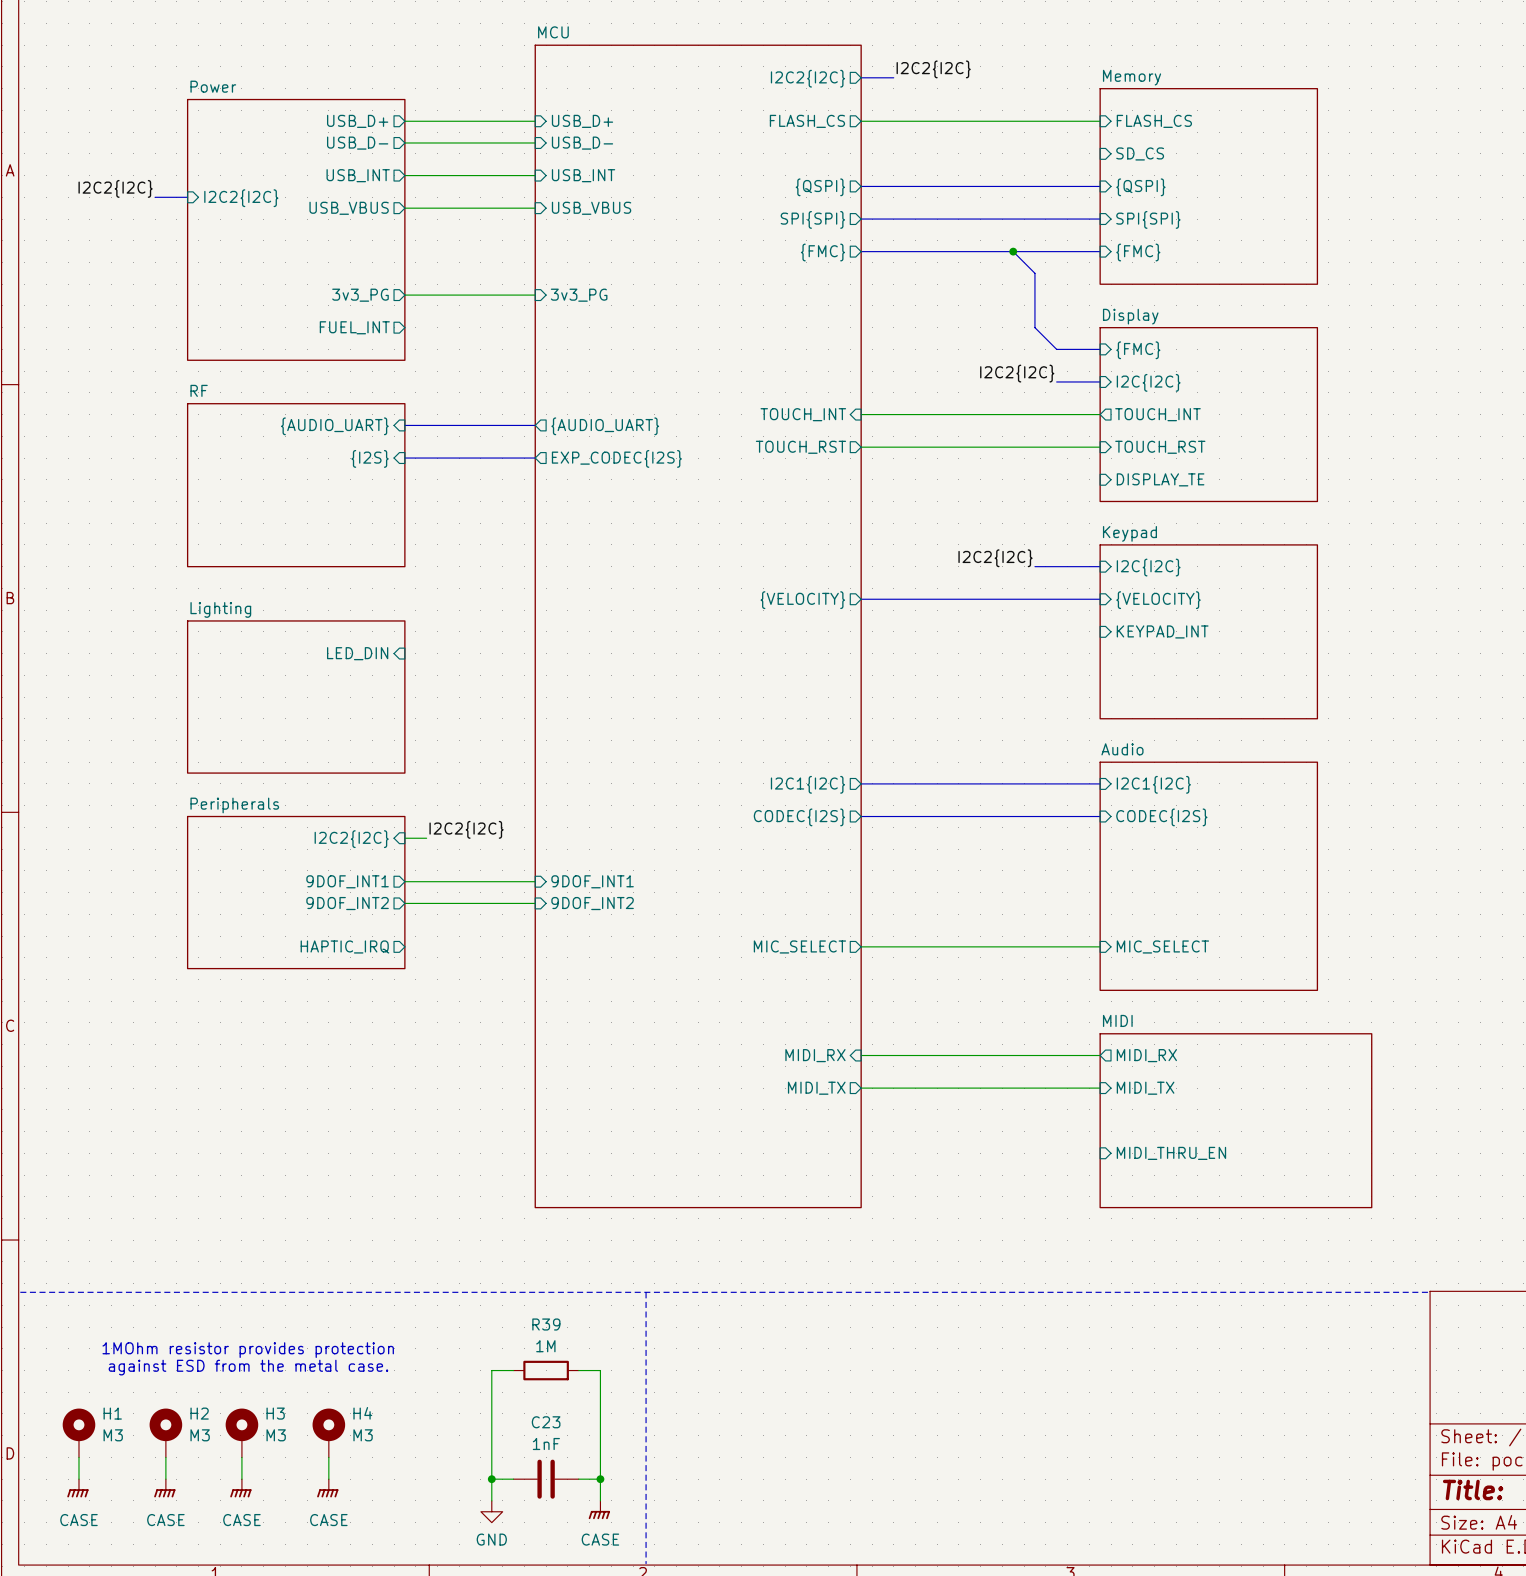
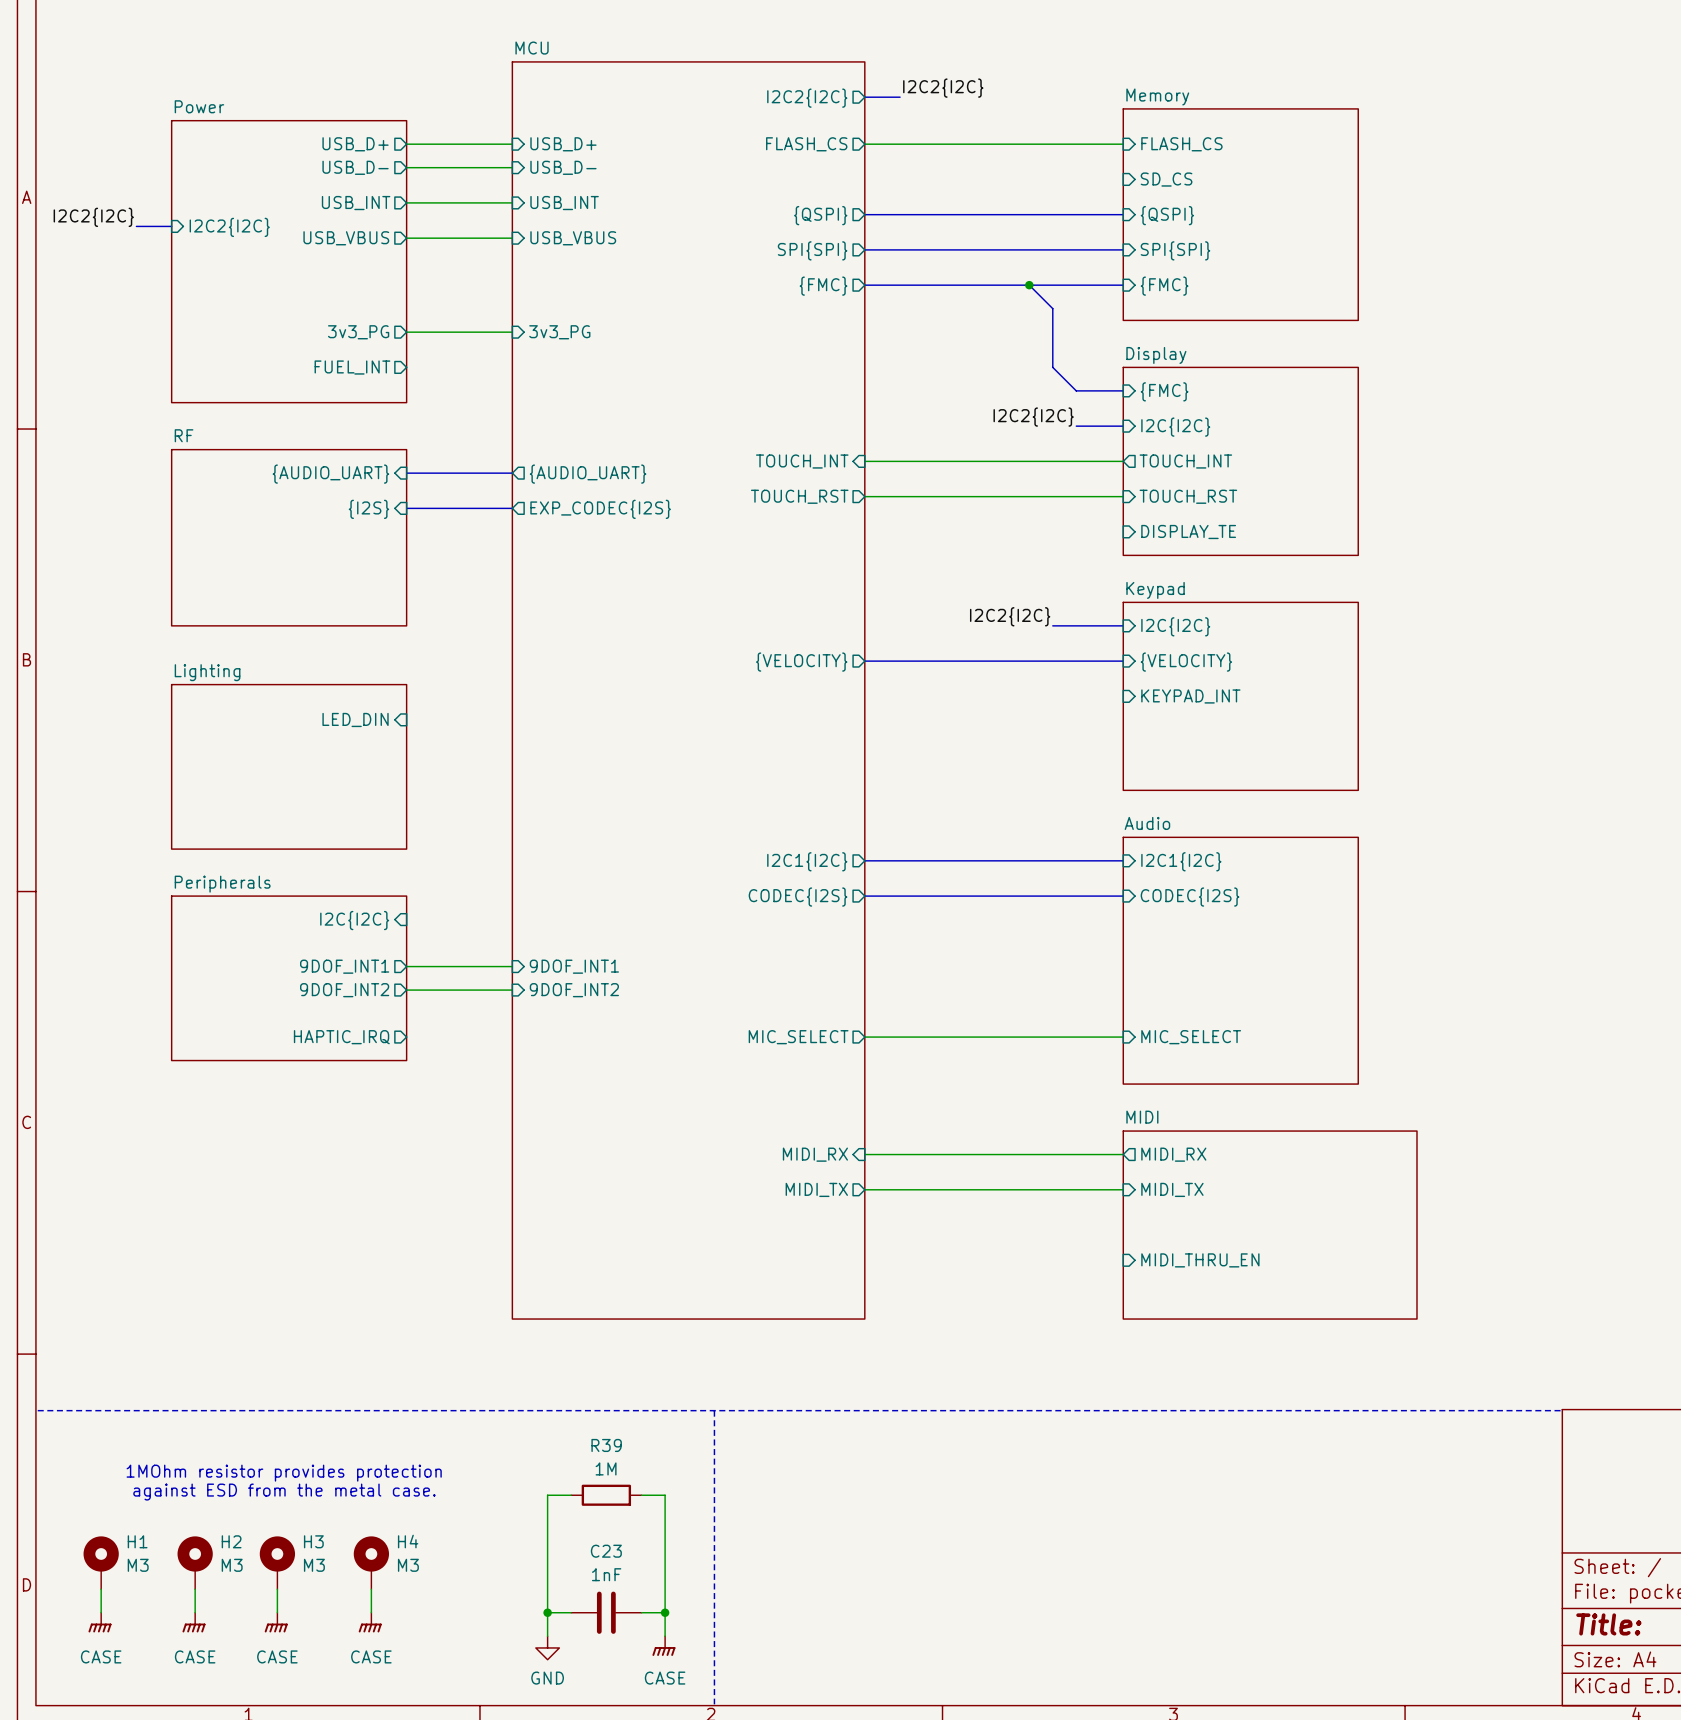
label position: I2C2{I2C} (933, 69) -> I2C2{I2C} (943, 88)
bus: (861, 77) (893, 77) -> (864, 97) (900, 97)
sheet pin position: I2C2{I2C} (807, 78) -> I2C2{I2C} (807, 98)
sheet pin: none -> USB_D+ (355, 144)
sheet pin: USB_D+ (357, 121) -> none
wire: none -> (406, 144) (453, 144)
wire: (459, 121) (535, 121) -> none
sheet pin: none -> USB_D+ (563, 144)
sheet pin: USB_D+ (582, 121) -> none
wire: none -> (864, 144) (947, 144)
sheet pin position: FLASH_CS (807, 121) -> FLASH_CS (806, 144)
wire: (1024, 121) (1100, 121) -> none
sheet pin position: FLASH_CS (1154, 121) -> FLASH_CS (1181, 144)
wire: none -> (406, 167) (453, 167)
wire: (459, 142) (535, 142) -> none
sheet pin: none -> USB_D- (355, 167)
sheet pin: USB_D- (357, 143) -> none
sheet pin: none -> USB_D- (563, 167)
sheet pin: USB_D- (582, 143) -> none
sheet pin position: SD_CS (1140, 153) -> SD_CS (1166, 179)
sheet pin position: USB_INT (358, 175) -> USB_INT (356, 203)
wire: none -> (406, 202) (453, 202)
wire: (459, 175) (535, 175) -> none
sheet pin position: USB_INT (583, 175) -> USB_INT (564, 203)
bus: none -> (864, 214) (947, 214)
bus: (1024, 186) (1100, 186) -> none
sheet Memory position: (1208, 186) -> (1240, 214)
sheet pin position: {QSPI} (820, 187) -> {QSPI} (820, 215)
sheet pin position: {QSPI} (1140, 187) -> {QSPI} (1167, 215)
label position: I2C2{I2C} (115, 188) -> I2C2{I2C} (93, 217)
bus: (155, 197) (187, 197) -> (136, 226) (171, 226)
sheet pin position: I2C2{I2C} (241, 198) -> I2C2{I2C} (229, 227)
sheet pin position: USB_VBUS (349, 208) -> USB_VBUS (346, 238)
wire: none -> (406, 238) (453, 238)
wire: (459, 208) (535, 208) -> none
sheet pin position: USB_VBUS (591, 208) -> USB_VBUS (573, 238)
bus: none -> (864, 249) (947, 249)
sheet pin position: SPI{SPI} (812, 219) -> SPI{SPI} (812, 250)
bus: (1024, 219) (1100, 219) -> none
sheet pin position: SPI{SPI} (1148, 219) -> SPI{SPI} (1175, 250)
sheet Power position: (296, 229) -> (289, 261)
bus: none -> (864, 285) (947, 285)
junction: none -> (1029, 285)
bus: (1013, 251) (1034, 273) (1034, 327) (1056, 349) (1100, 349) -> (1029, 285) (1052, 308) (1052, 367) (1076, 390) (1123, 390)
junction: (1013, 251) -> none
bus: (1024, 251) (1100, 251) -> none
sheet pin position: {FMC} (822, 252) -> {FMC} (823, 286)
sheet pin: none -> {FMC} (1164, 286)
sheet pin: {FMC} (1138, 252) -> none
sheet pin position: 3v3_PG (360, 295) -> 3v3_PG (358, 332)
wire: none -> (406, 332) (453, 332)
wire: (459, 295) (535, 295) -> none
sheet pin: none -> 3v3_PG (559, 332)
sheet pin: 3v3_PG (579, 295) -> none
sheet pin position: FUEL_INT (354, 327) -> FUEL_INT (352, 367)
sheet pin: none -> {FMC} (1164, 391)
sheet pin: {FMC} (1138, 350) -> none
label position: I2C2{I2C} (1017, 373) -> I2C2{I2C} (1033, 417)
bus: (1056, 381) (1100, 381) -> (1076, 426) (1123, 426)
sheet pin position: I2C{I2C} (1148, 382) -> I2C{I2C} (1175, 427)
wire: none -> (864, 461) (947, 461)
sheet pin position: TOUCH_INT (803, 414) -> TOUCH_INT (802, 461)
wire: (1024, 414) (1100, 414) -> none
sheet pin position: TOUCH_INT (1157, 414) -> TOUCH_INT (1185, 461)
sheet Display position: (1208, 414) -> (1240, 461)
bus: none -> (406, 473) (453, 473)
bus: (459, 425) (535, 425) -> none
sheet pin position: {AUDIO_UART} (334, 426) -> {AUDIO_UART} (330, 474)
sheet pin position: {AUDIO_UART} (605, 426) -> {AUDIO_UART} (588, 474)
wire: none -> (864, 496) (947, 496)
sheet pin position: TOUCH_RST (800, 447) -> TOUCH_RST (799, 496)
wire: (1024, 447) (1100, 447) -> none
sheet pin position: TOUCH_RST (1160, 447) -> TOUCH_RST (1188, 496)
bus: none -> (406, 508) (453, 508)
sheet pin position: {I2S} (370, 458) -> {I2S} (368, 509)
bus: (459, 458) (535, 458) -> none
sheet pin position: EXP_CODEC{I2S} (616, 458) -> EXP_CODEC{I2S} (600, 509)
sheet pin position: DISPLAY_TE (1160, 479) -> DISPLAY_TE (1188, 532)
sheet RF position: (296, 485) -> (289, 537)
label position: I2C2{I2C} (995, 558) -> I2C2{I2C} (1010, 616)
bus: (1034, 566) (1100, 566) -> (1052, 625) (1123, 625)
sheet pin position: I2C{I2C} (1148, 567) -> I2C{I2C} (1175, 626)
bus: none -> (864, 661) (947, 661)
bus: (1024, 599) (1100, 599) -> none
sheet pin position: {VELOCITY} (802, 600) -> {VELOCITY} (801, 662)
sheet pin position: {VELOCITY} (1158, 600) -> {VELOCITY} (1186, 662)
sheet MCU position: (698, 626) -> (688, 690)
sheet pin position: KEYPAD_INT (1162, 631) -> KEYPAD_INT (1190, 696)
sheet Keypad position: (1208, 631) -> (1240, 696)
sheet pin position: LED_DIN (357, 653) -> LED_DIN (355, 719)
sheet Lighting position: (296, 697) -> (289, 766)
bus: none -> (864, 860) (947, 860)
bus: (1024, 783) (1100, 783) -> none
sheet pin position: I2C1{I2C} (807, 784) -> I2C1{I2C} (807, 861)
sheet pin position: I2C1{I2C} (1153, 784) -> I2C1{I2C} (1181, 861)
bus: none -> (864, 896) (947, 896)
bus: (1024, 816) (1100, 816) -> none
sheet pin position: CODEC{I2S} (799, 817) -> CODEC{I2S} (798, 897)
sheet pin position: CODEC{I2S} (1161, 817) -> CODEC{I2S} (1190, 897)
label: I2C2{I2C} (466, 829) -> none
wire: (404, 838) (426, 838) -> none
sheet pin: I2C2{I2C} (351, 839) -> I2C{I2C} (354, 920)
sheet Audio position: (1208, 876) -> (1240, 960)
sheet pin: none -> 9DOF_INT1 (344, 966)
sheet pin: 9DOF_INT1 (347, 881) -> none
wire: none -> (406, 966) (453, 966)
wire: (459, 881) (535, 881) -> none
sheet pin: none -> 9DOF_INT1 (574, 966)
sheet pin: 9DOF_INT1 (592, 881) -> none
sheet Peripherals position: (296, 892) -> (289, 978)
sheet pin: none -> 9DOF_INT2 (344, 990)
sheet pin: 9DOF_INT2 (347, 903) -> none
wire: none -> (406, 990) (453, 990)
wire: (459, 903) (535, 903) -> none
sheet pin: none -> 9DOF_INT2 (574, 990)
sheet pin: 9DOF_INT2 (592, 903) -> none
sheet pin position: HAPTIC_IRQ (344, 946) -> HAPTIC_IRQ (341, 1037)
wire: none -> (864, 1037) (947, 1037)
sheet pin position: MIC_SELECT (799, 946) -> MIC_SELECT (798, 1037)
wire: (1024, 946) (1100, 946) -> none
sheet pin position: MIC_SELECT (1162, 946) -> MIC_SELECT (1191, 1037)
wire: none -> (864, 1154) (947, 1154)
sheet pin position: MIDI_RX (815, 1055) -> MIDI_RX (815, 1154)
wire: (1024, 1055) (1100, 1055) -> none
sheet pin position: MIDI_RX (1146, 1055) -> MIDI_RX (1173, 1154)
wire: none -> (864, 1189) (947, 1189)
sheet pin position: MIDI_TX (816, 1088) -> MIDI_TX (816, 1189)
wire: (1024, 1088) (1100, 1088) -> none
sheet pin position: MIDI_TX (1145, 1088) -> MIDI_TX (1172, 1189)
sheet MIDI position: (1235, 1120) -> (1270, 1225)
sheet pin position: MIDI_THRU_EN (1171, 1153) -> MIDI_THRU_EN (1200, 1260)

